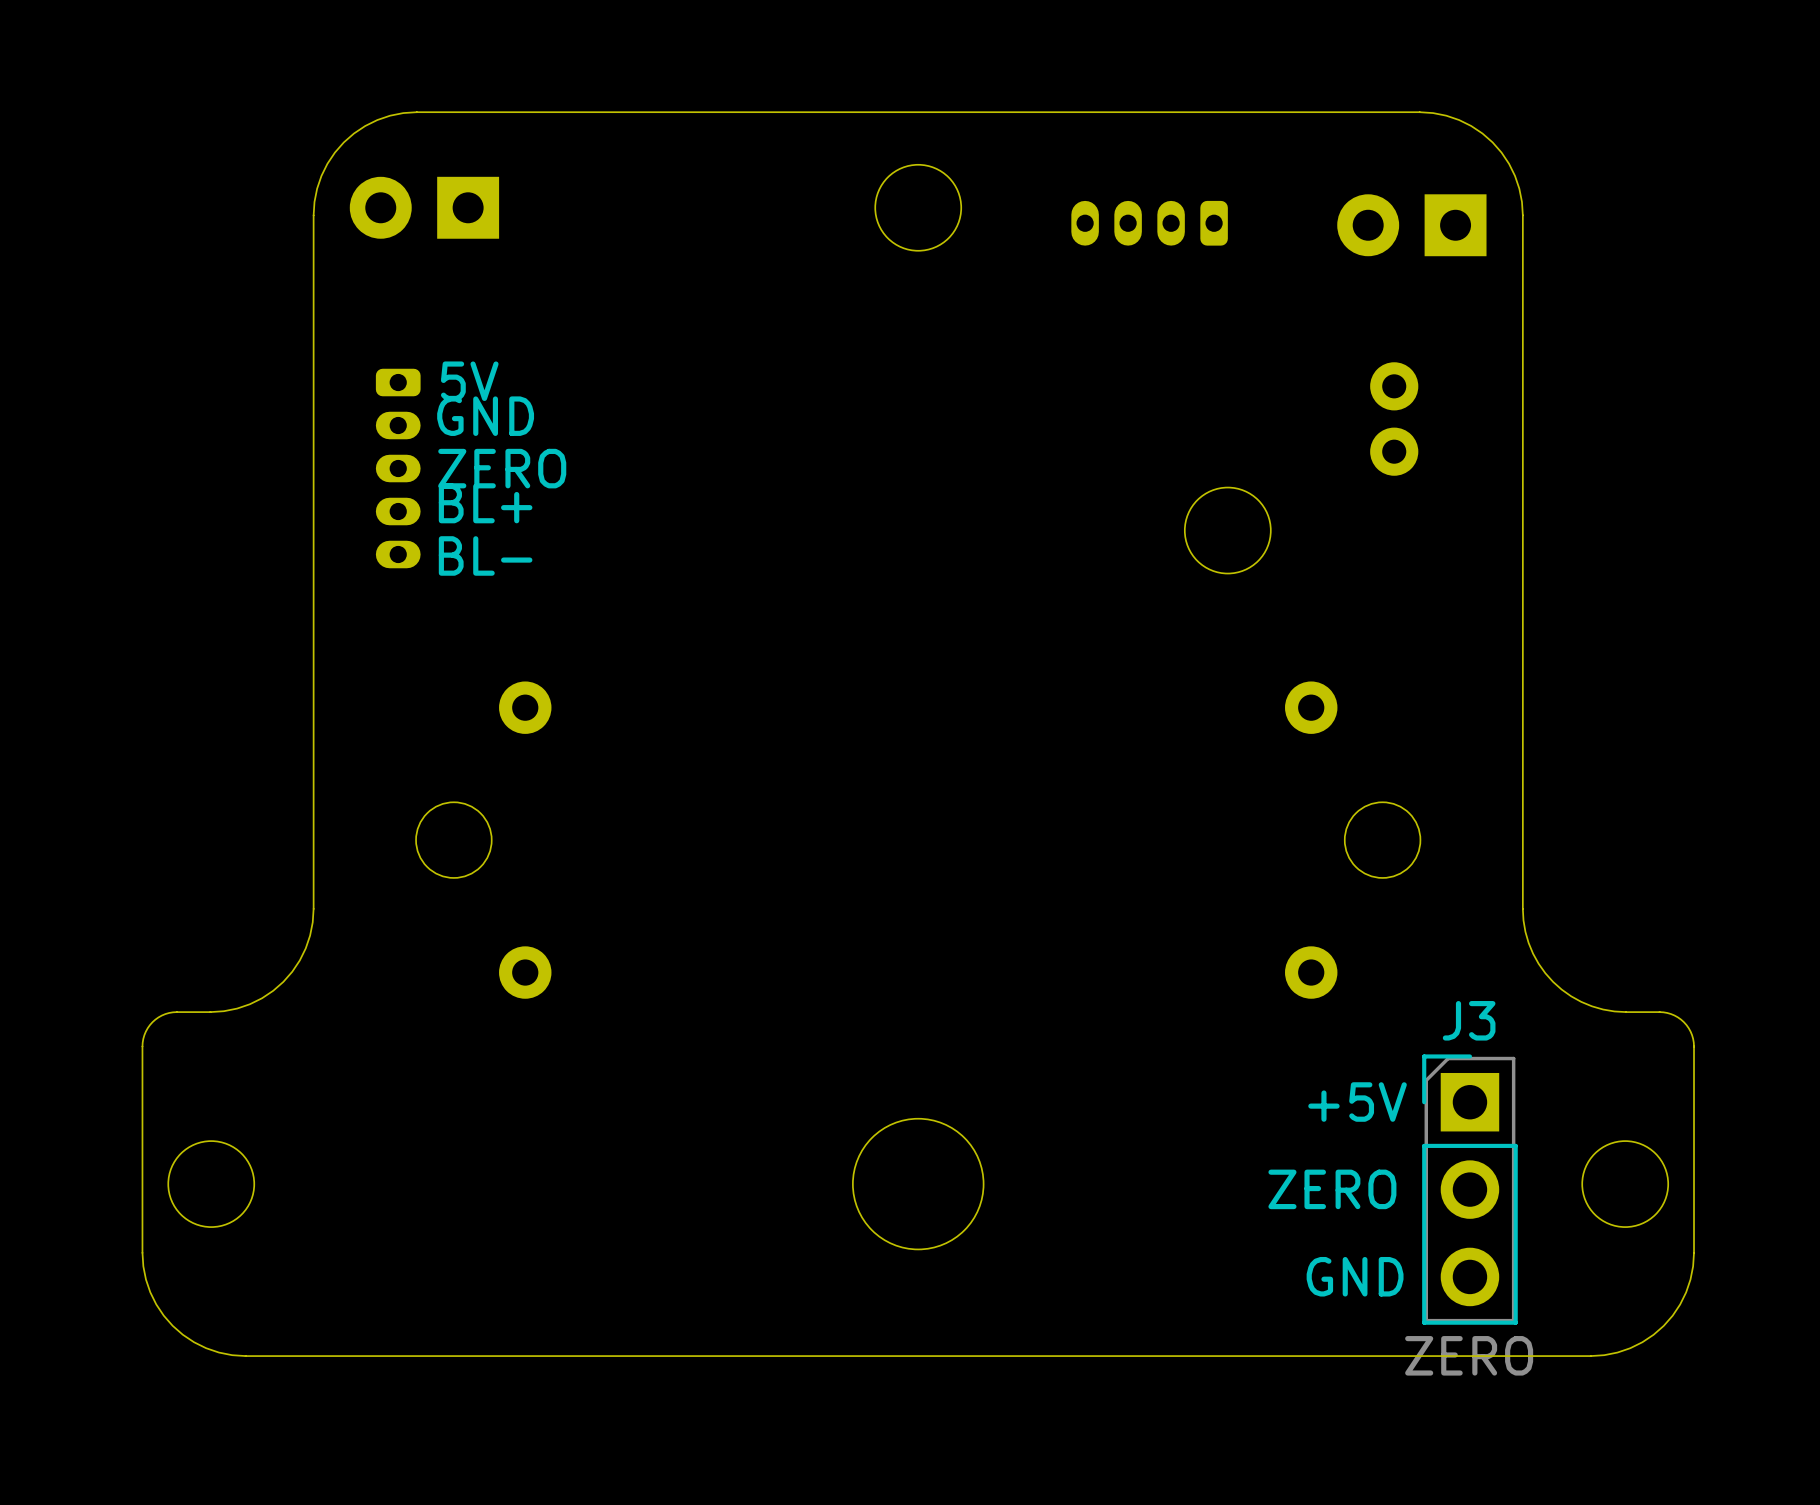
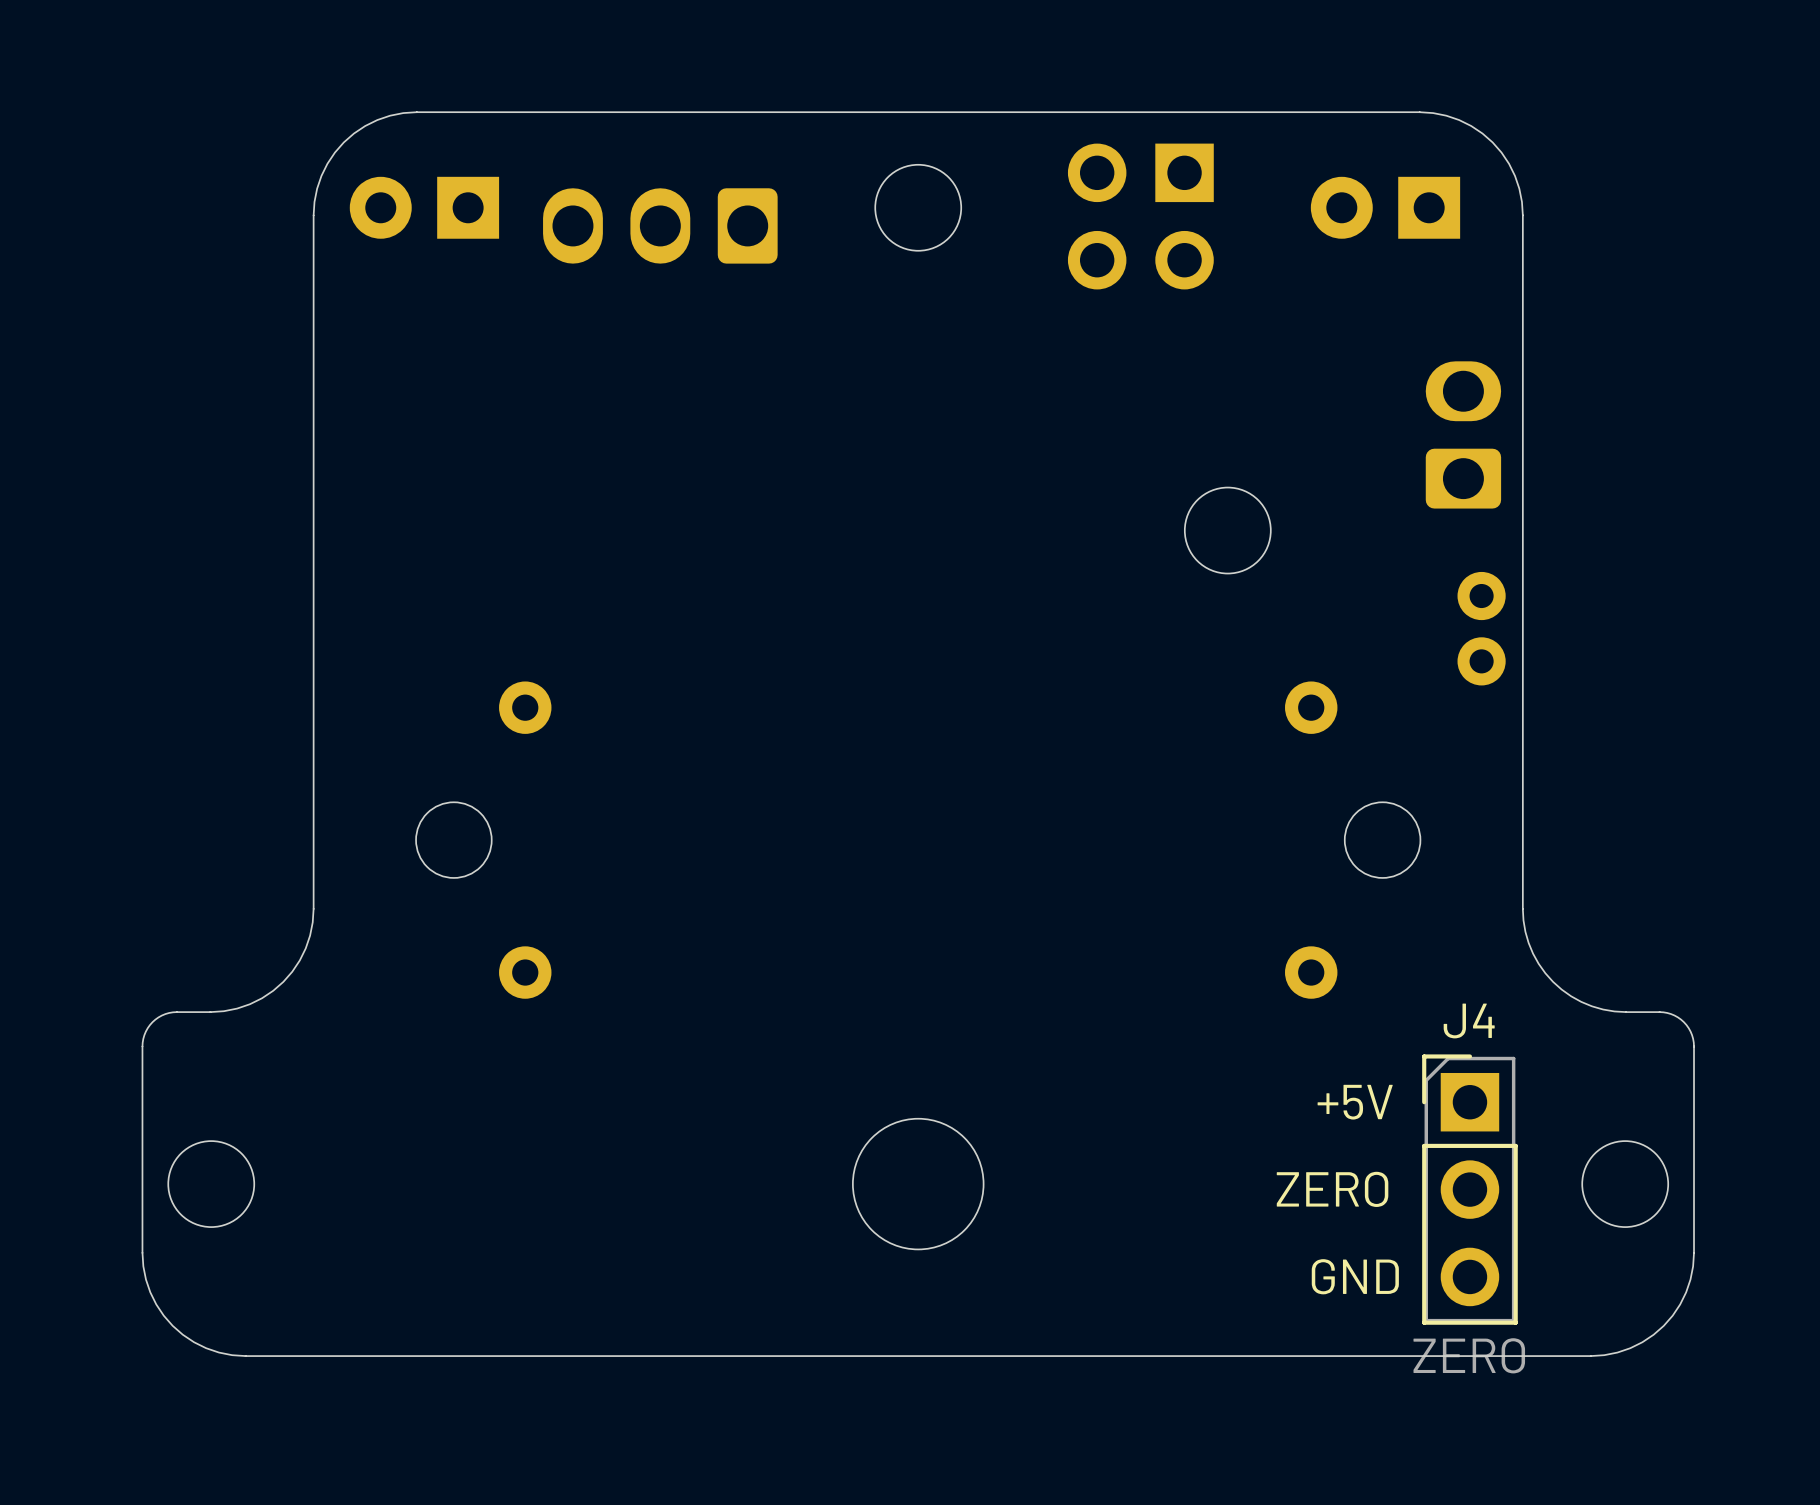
part footprint: [1071, 200, 1228, 246] -> [1067, 143, 1214, 290]
part: none -> (660, 225)
part position: (1411, 225) -> (1385, 207)
text: 5V (469, 381) -> none
text: GND (485, 416) -> none
part position: (1394, 419) -> (1481, 628)
part: none -> (1463, 434)
part: (398, 468) -> none
text: ZERO (502, 468) -> none
text: BL+ (485, 503) -> none
text: BL- (485, 555) -> none
J3 name: J3 (1469, 1020) -> J4 (1469, 1020)

